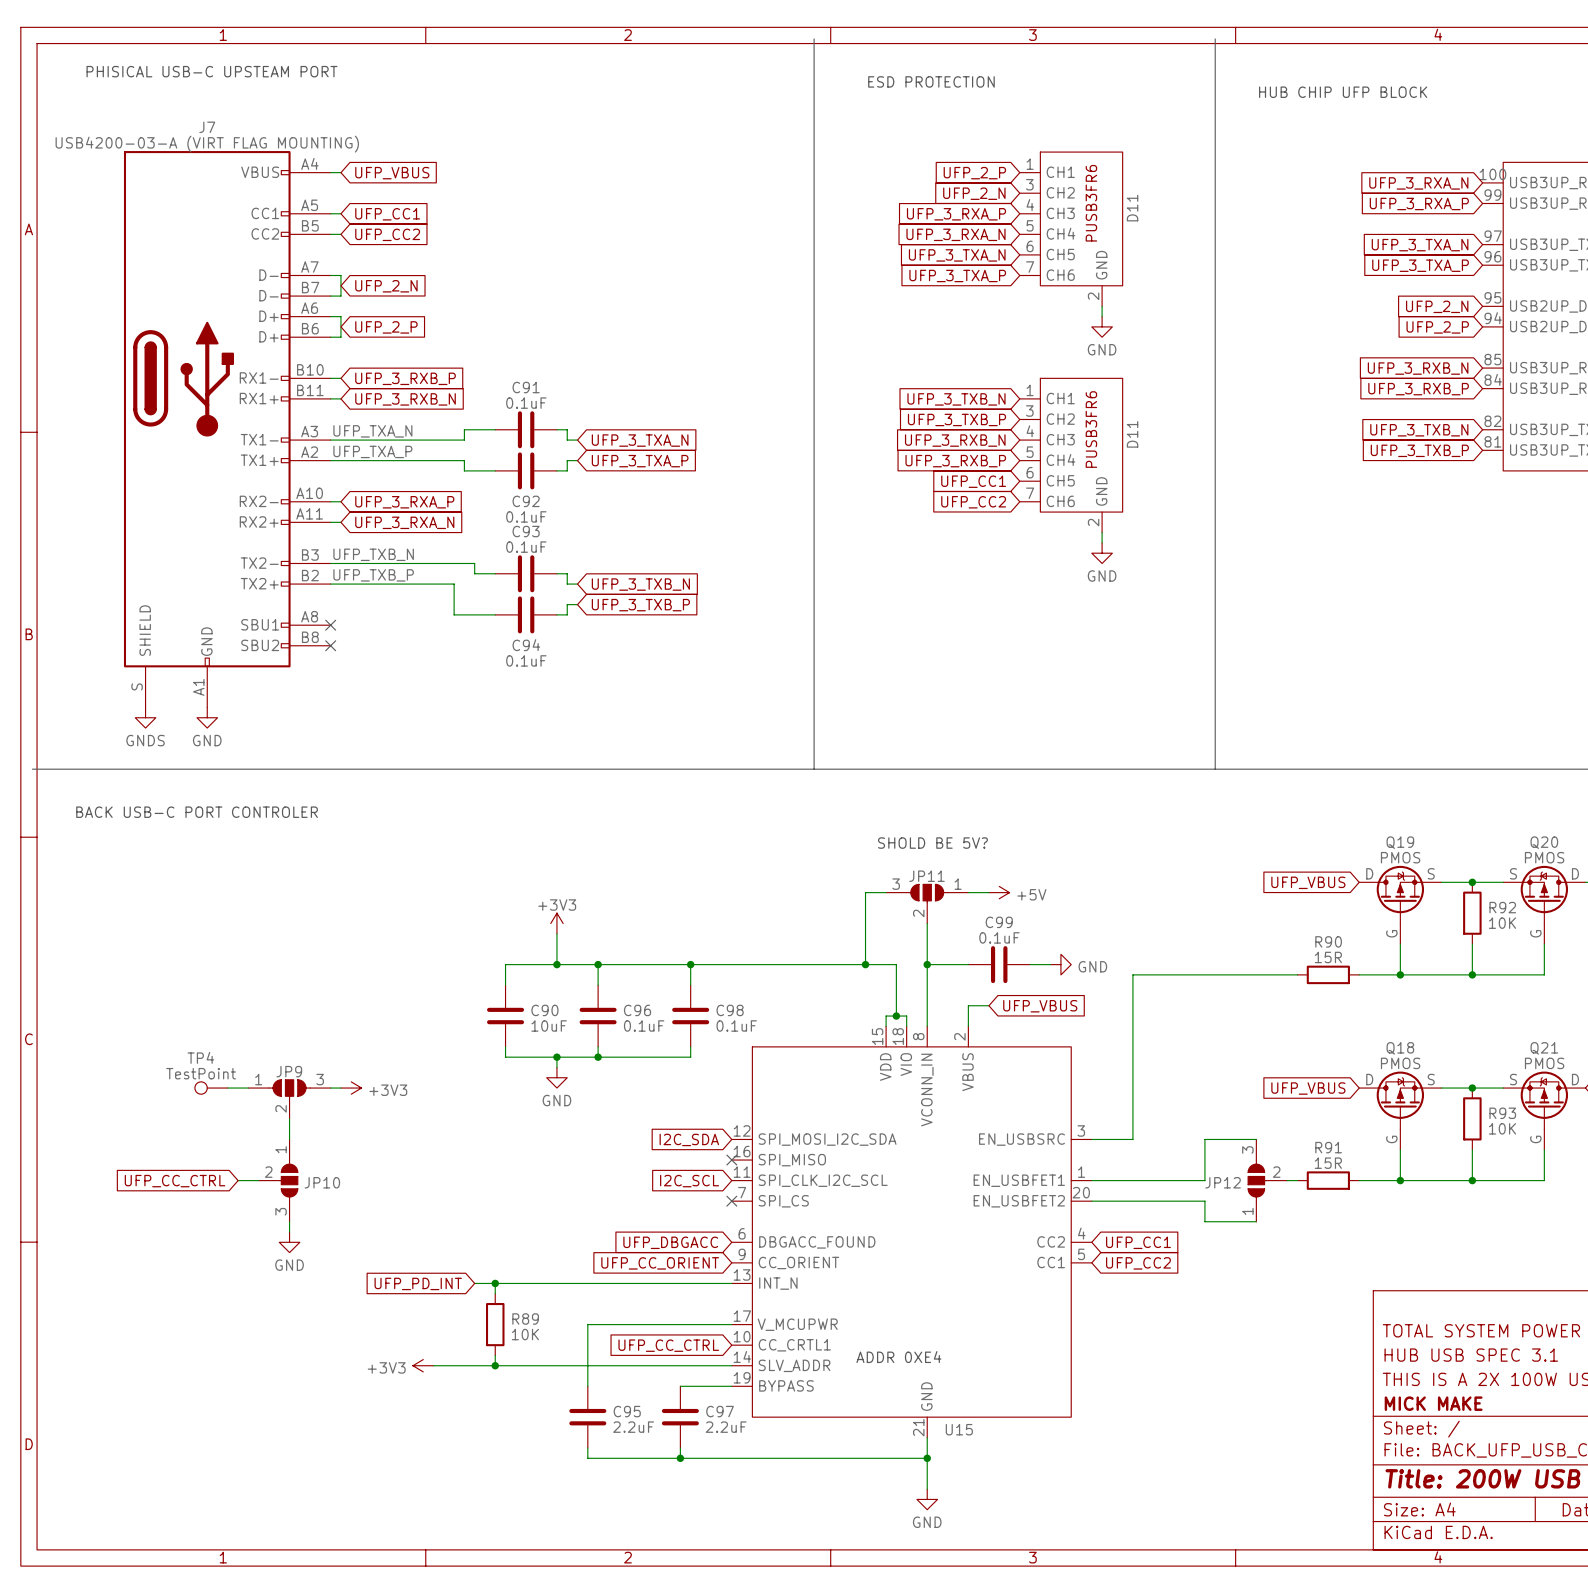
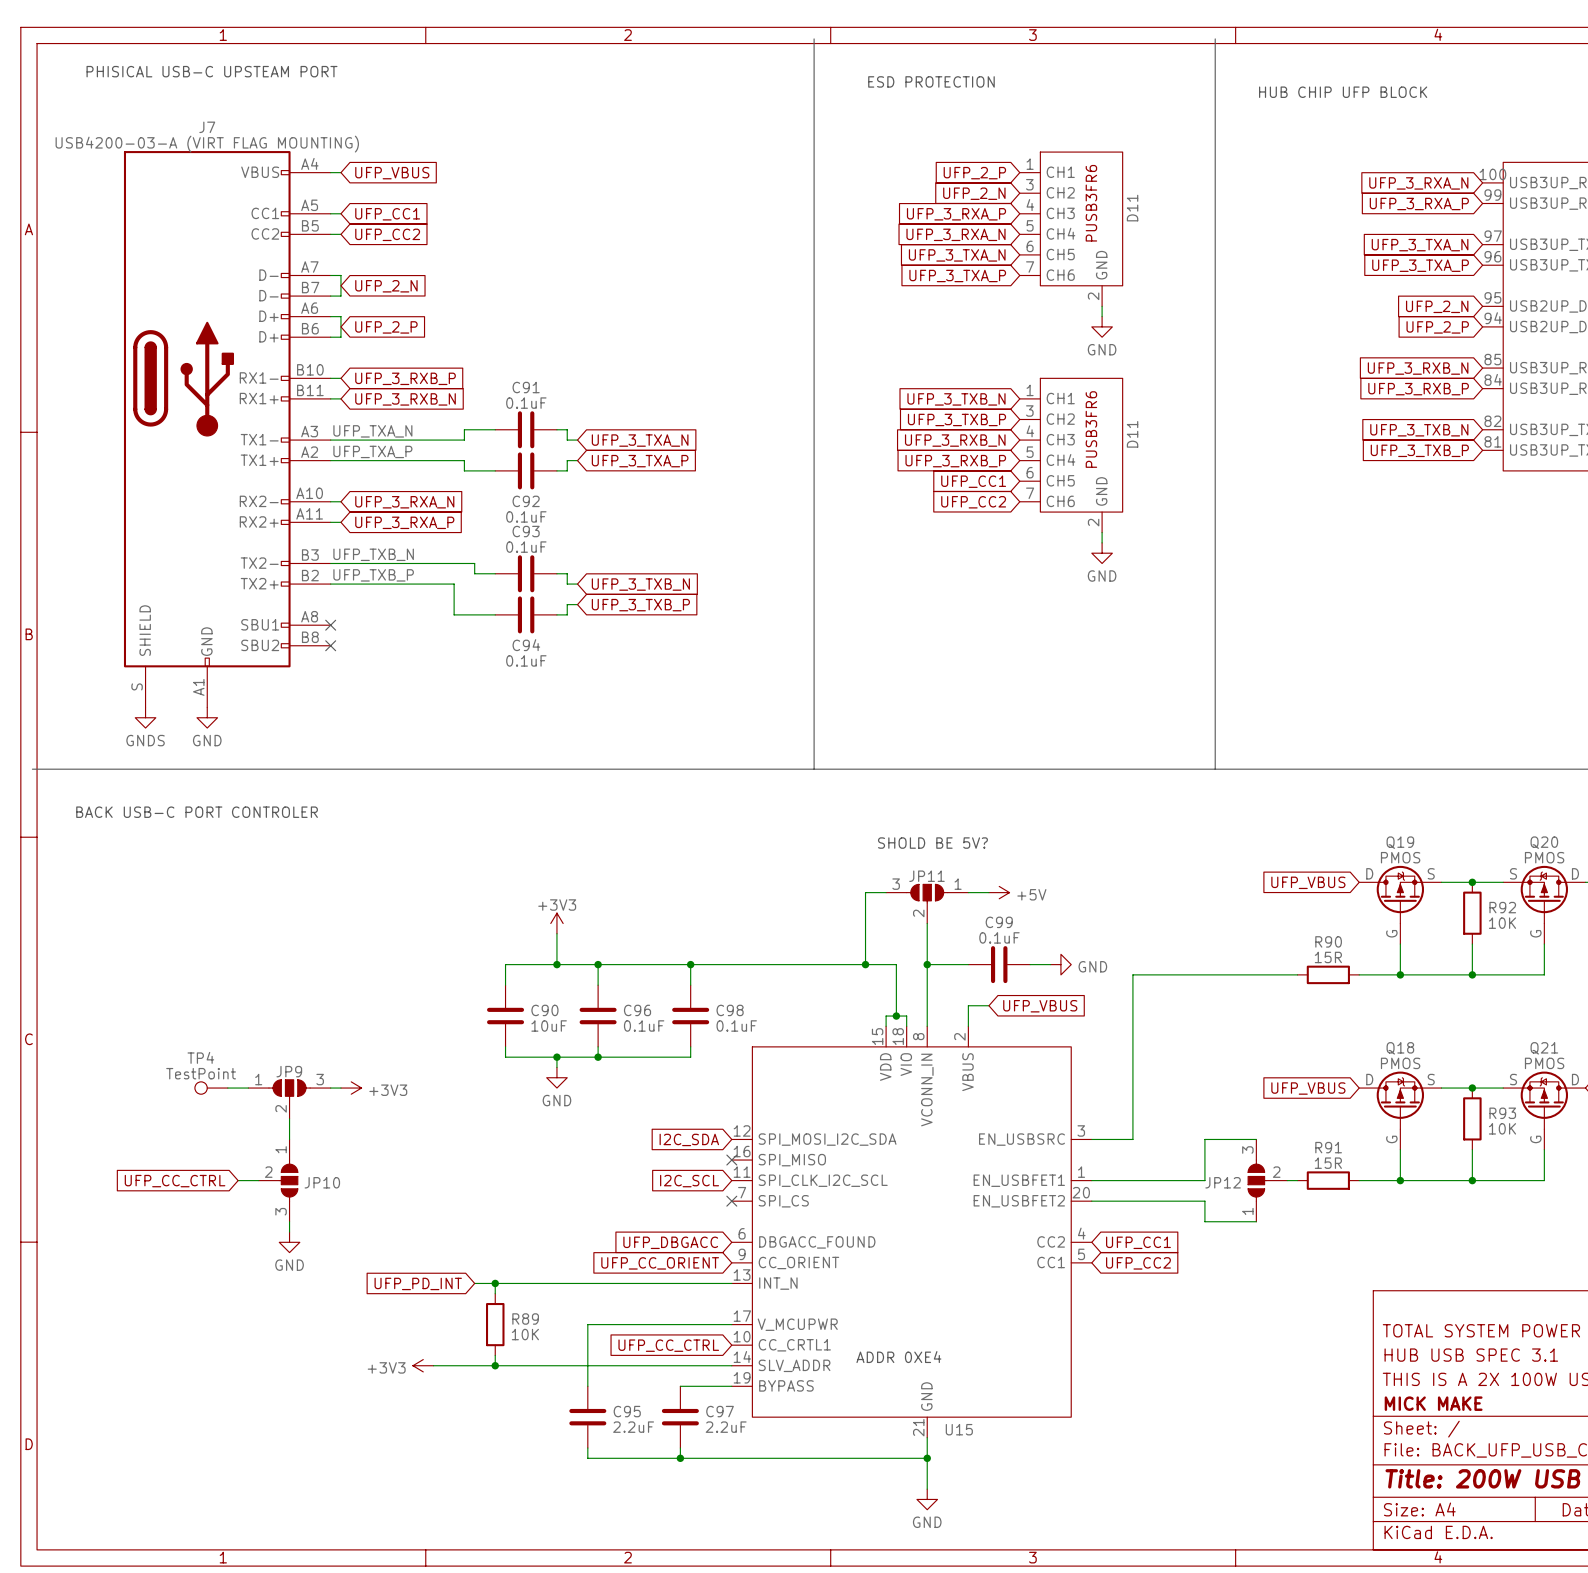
global label: UFP_3_RXA_P (404, 502) -> UFP_3_RXA_N (404, 502)
global label: UFP_3_RXA_N (404, 522) -> UFP_3_RXA_P (404, 522)

